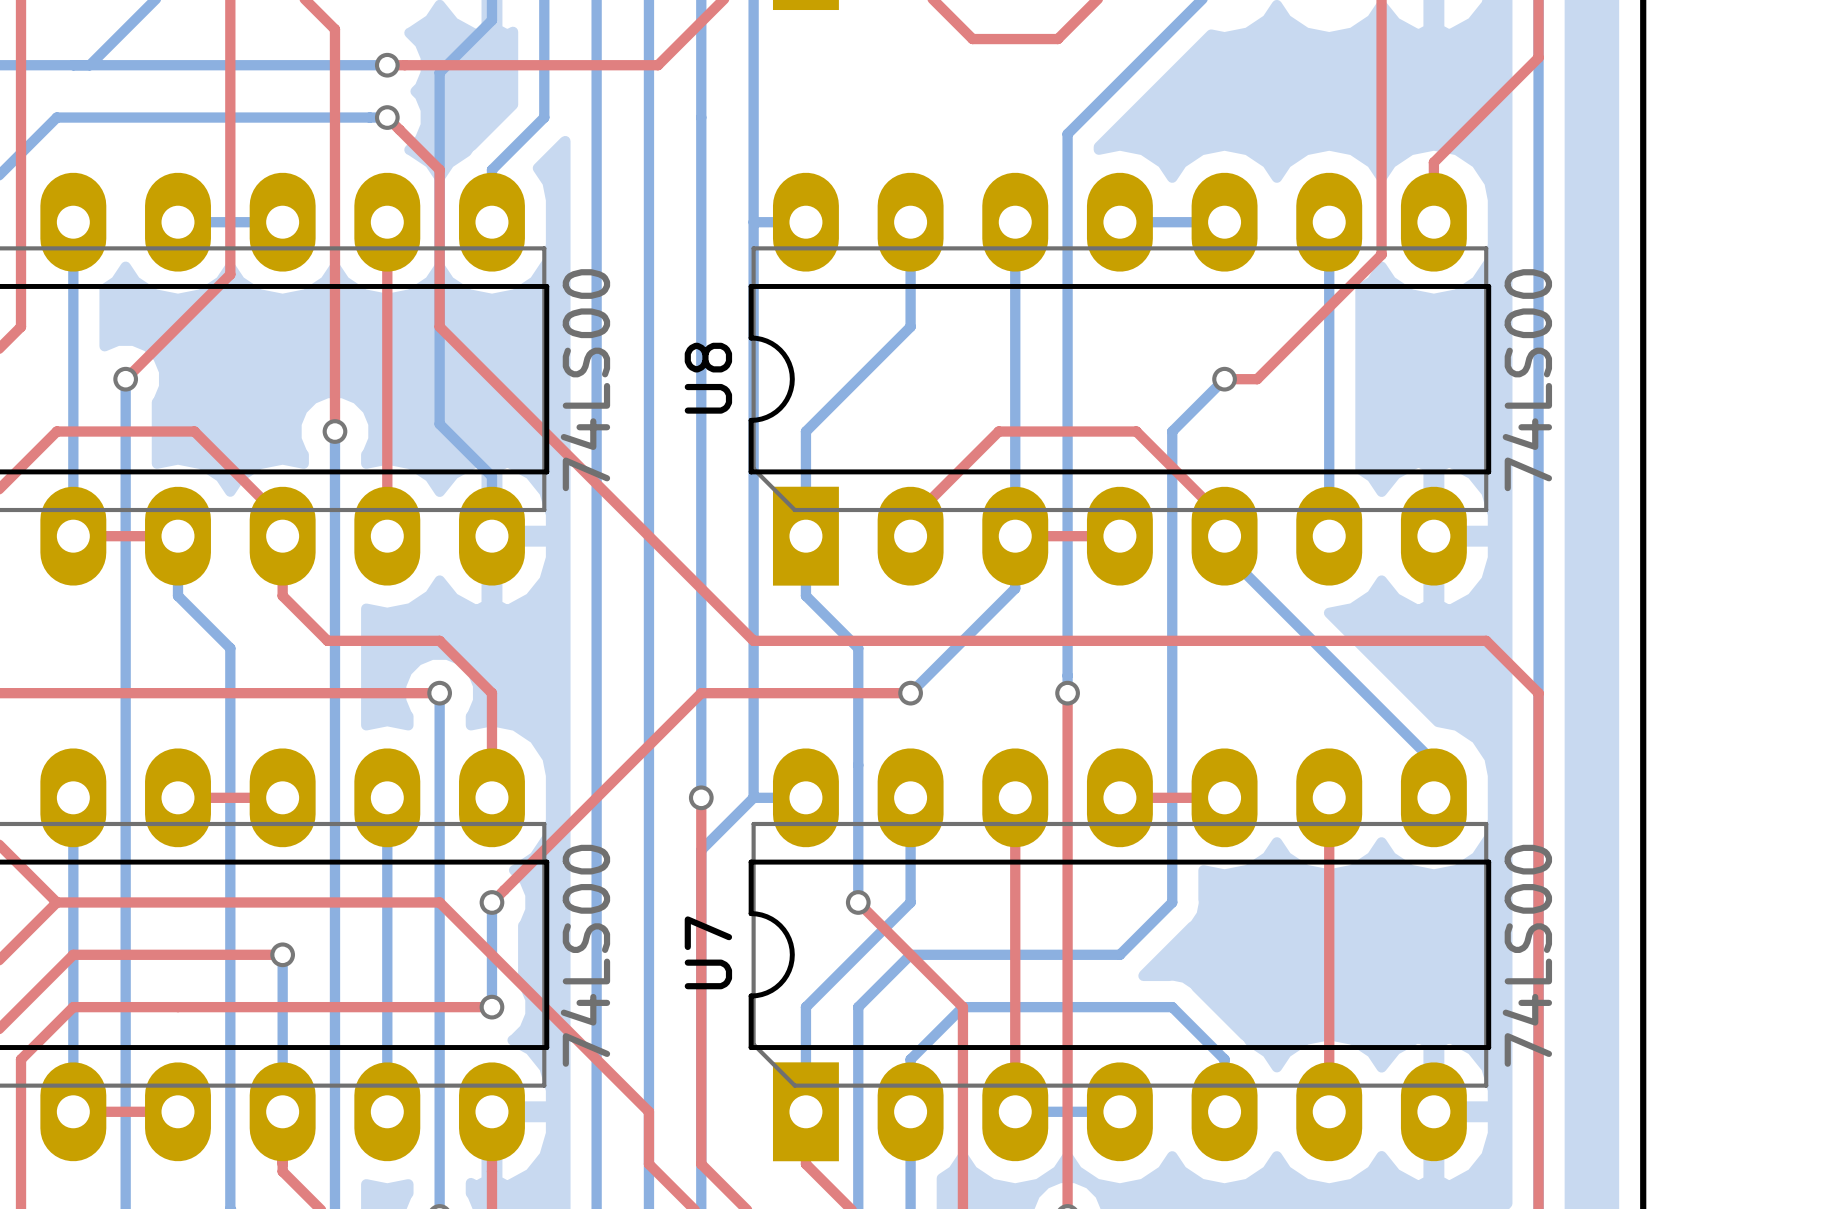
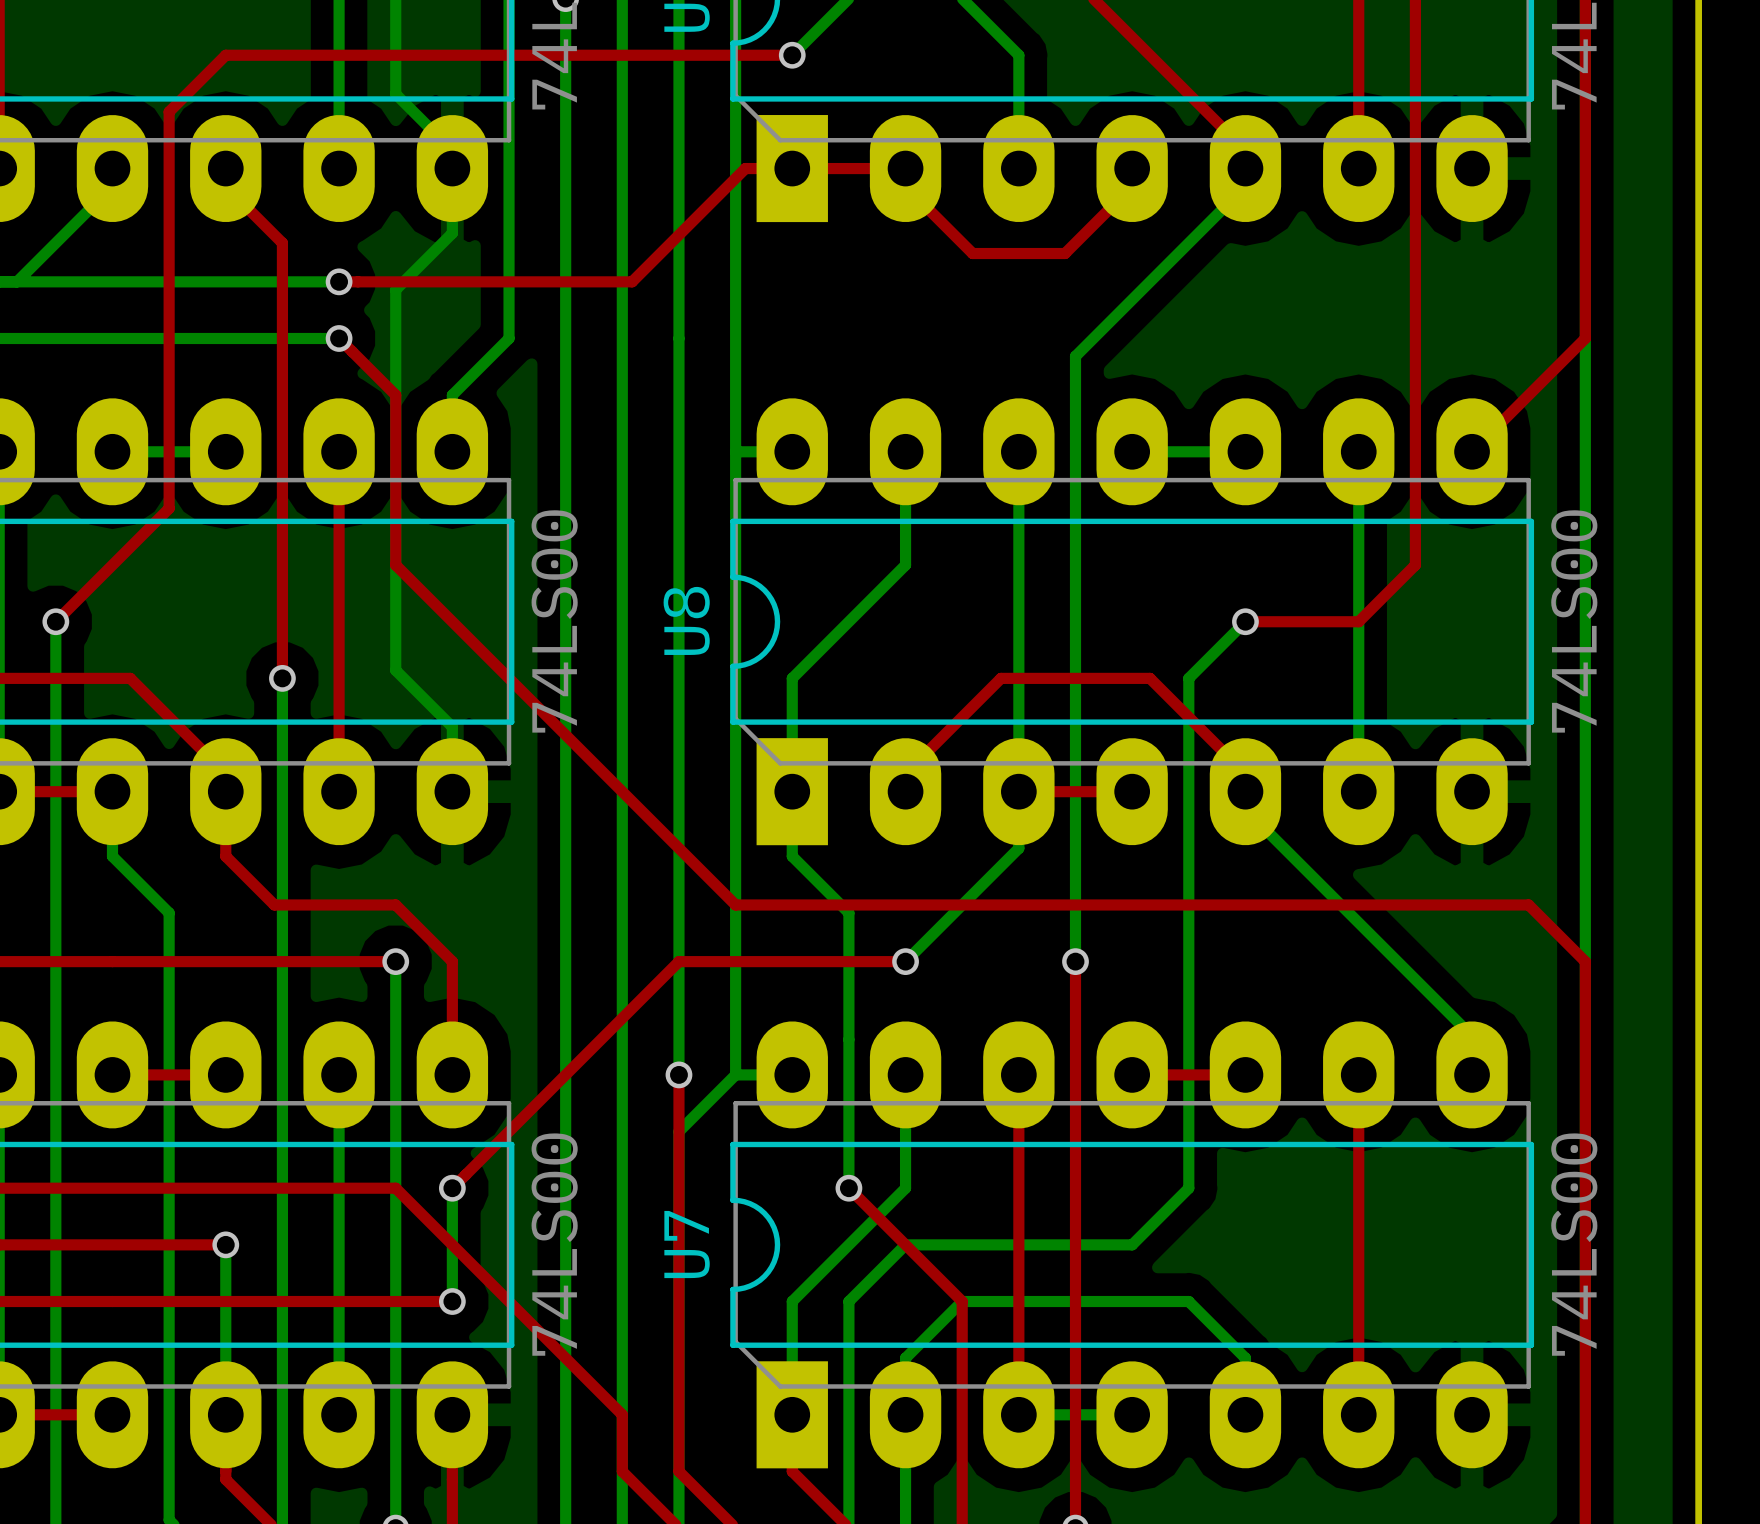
top track: (1538, 57) (1433, 162) (1433, 222) -> (1585, 273) (1585, 338) (1472, 451)
top track: (1381, 254) (1257, 379) -> (1415, 487) (1415, 565) (1358, 621) (1280, 621)

